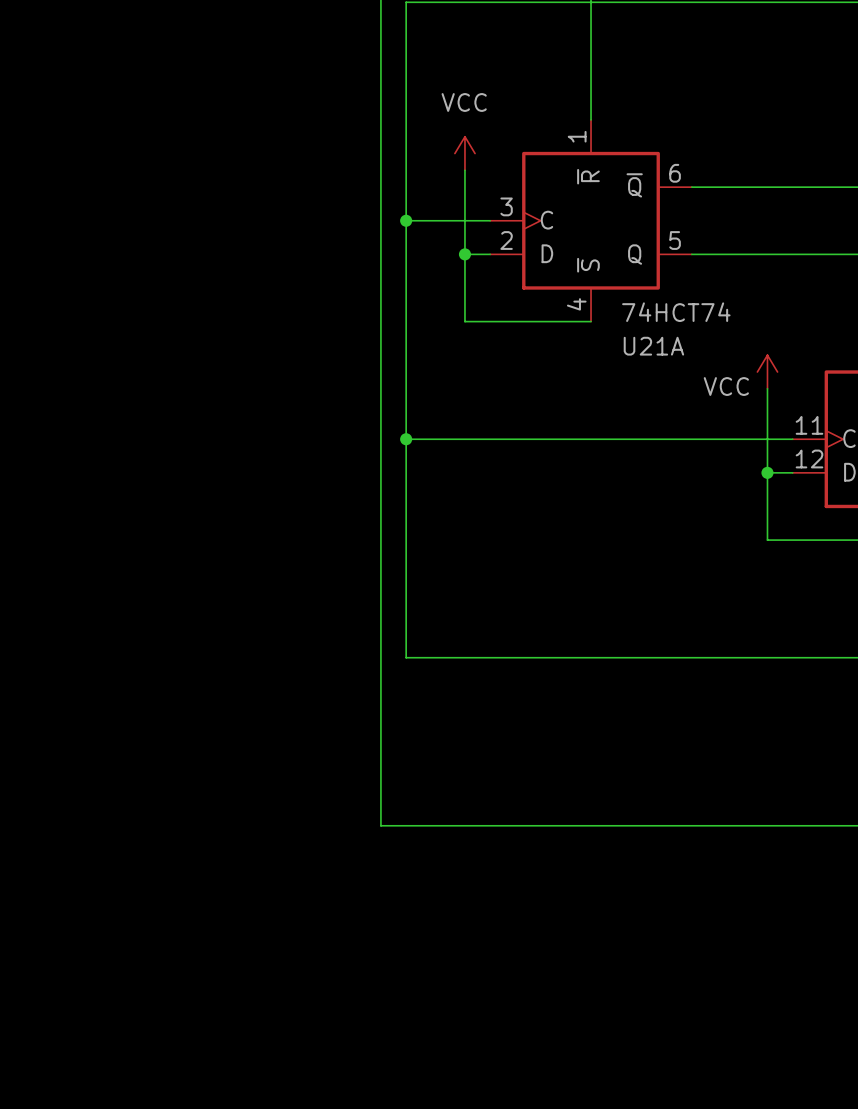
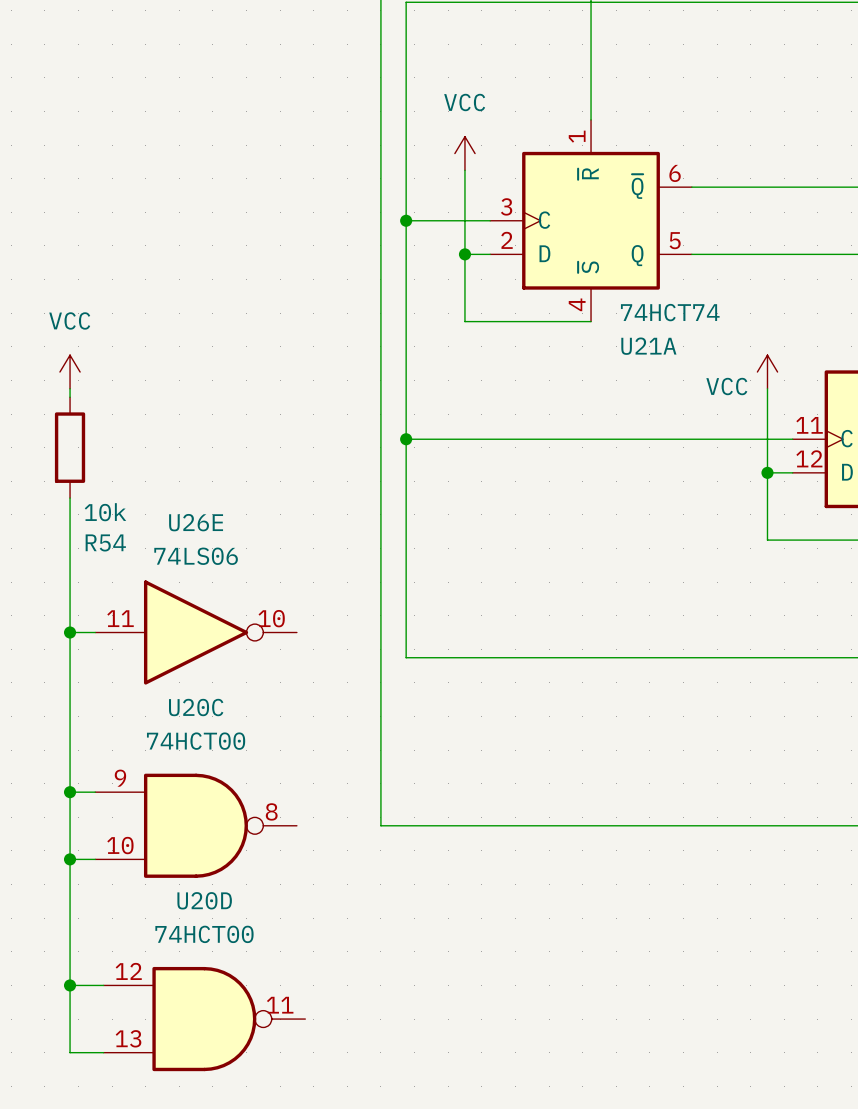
power symbol: none -> VCC (70, 372)
wire: none -> (70, 388) (70, 397)
R54: none -> 10k (70, 447)
wire: none -> (70, 498) (70, 1052) (103, 1052)
wire: none -> (70, 632) (95, 632)
junction: none -> (70, 632)
U26E: none -> 74LS06 (196, 632)
wire: none -> (70, 792) (95, 792)
junction: none -> (70, 792)
U20C: none -> 74HCT00 (196, 825)
wire: none -> (70, 859) (95, 859)
junction: none -> (70, 859)
wire: none -> (70, 985) (103, 985)
junction: none -> (70, 985)
U20D: none -> 74HCT00 (204, 1019)

